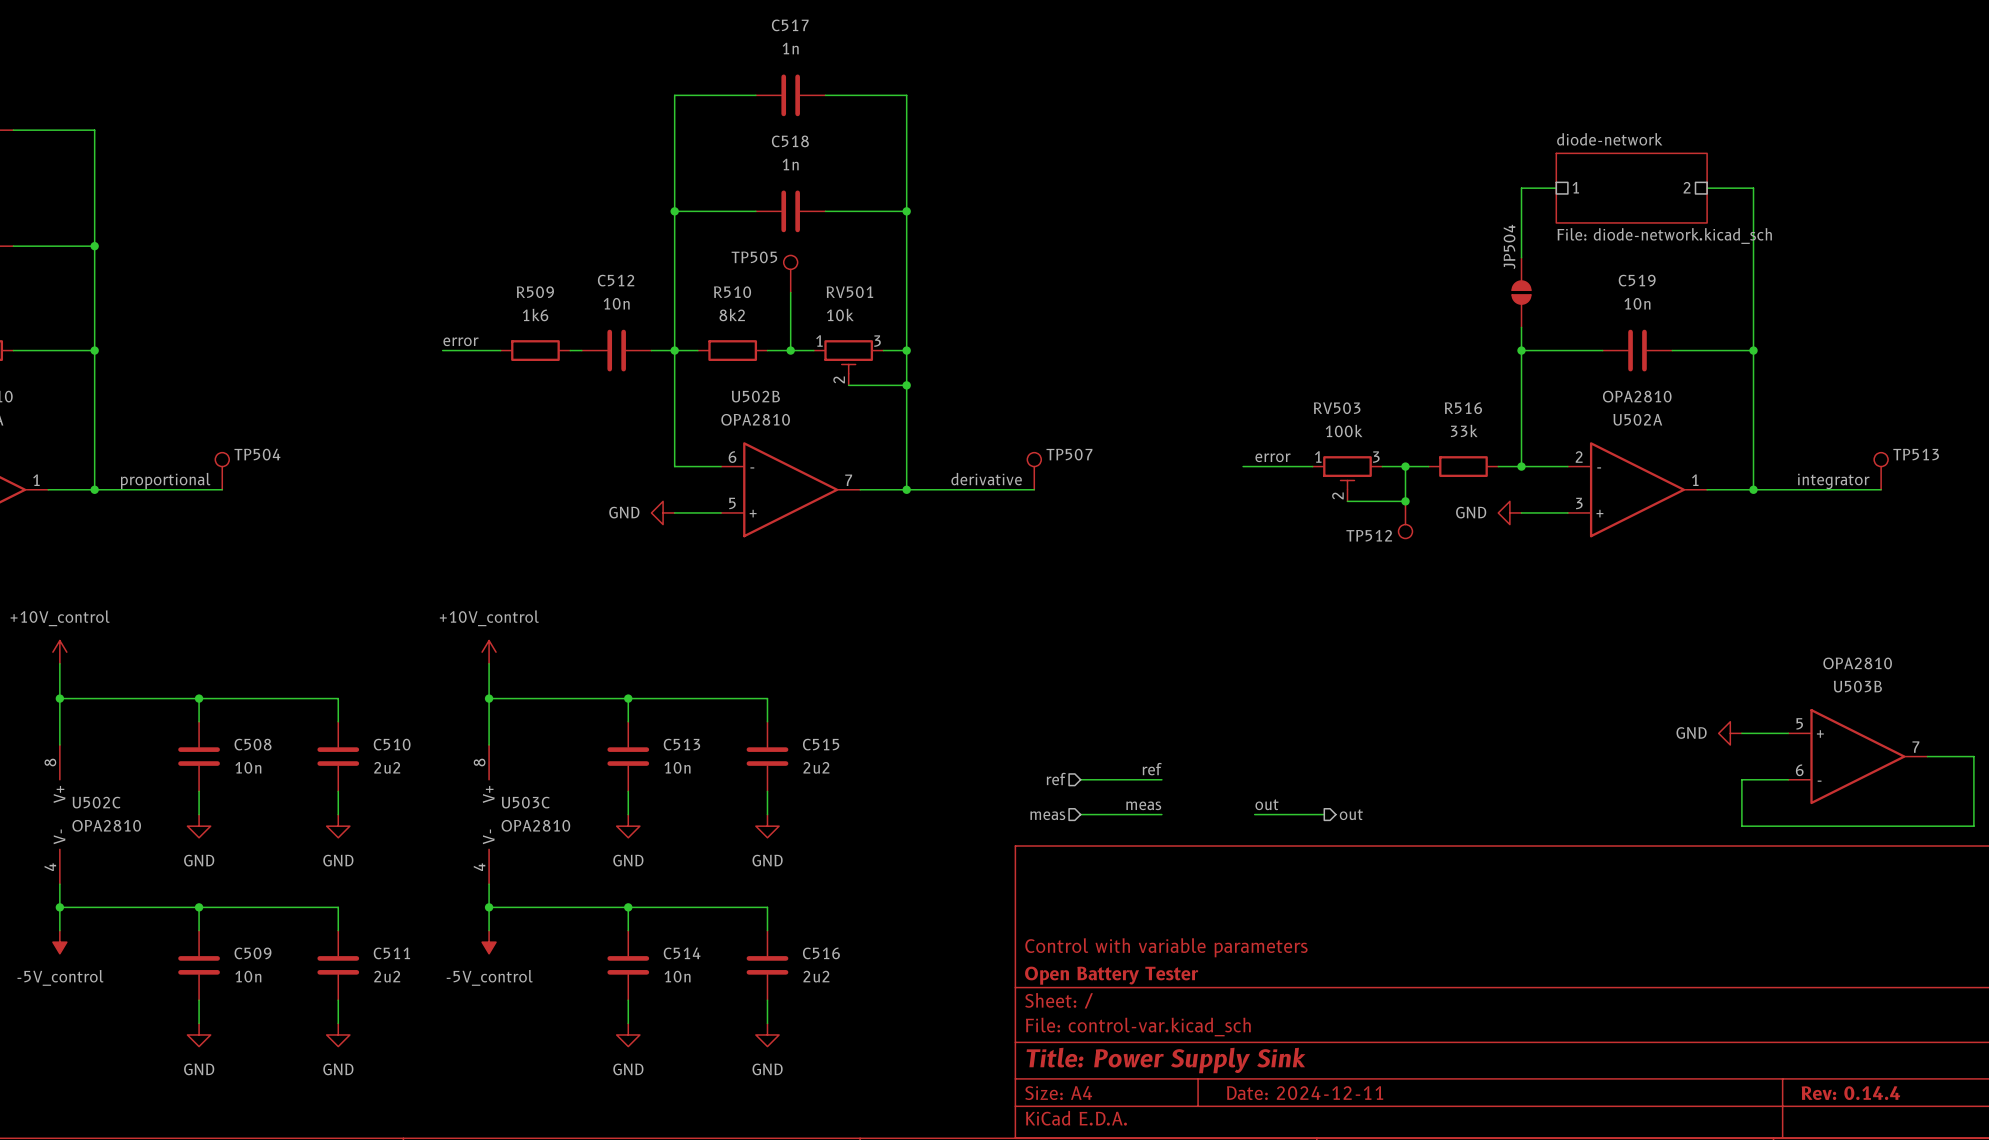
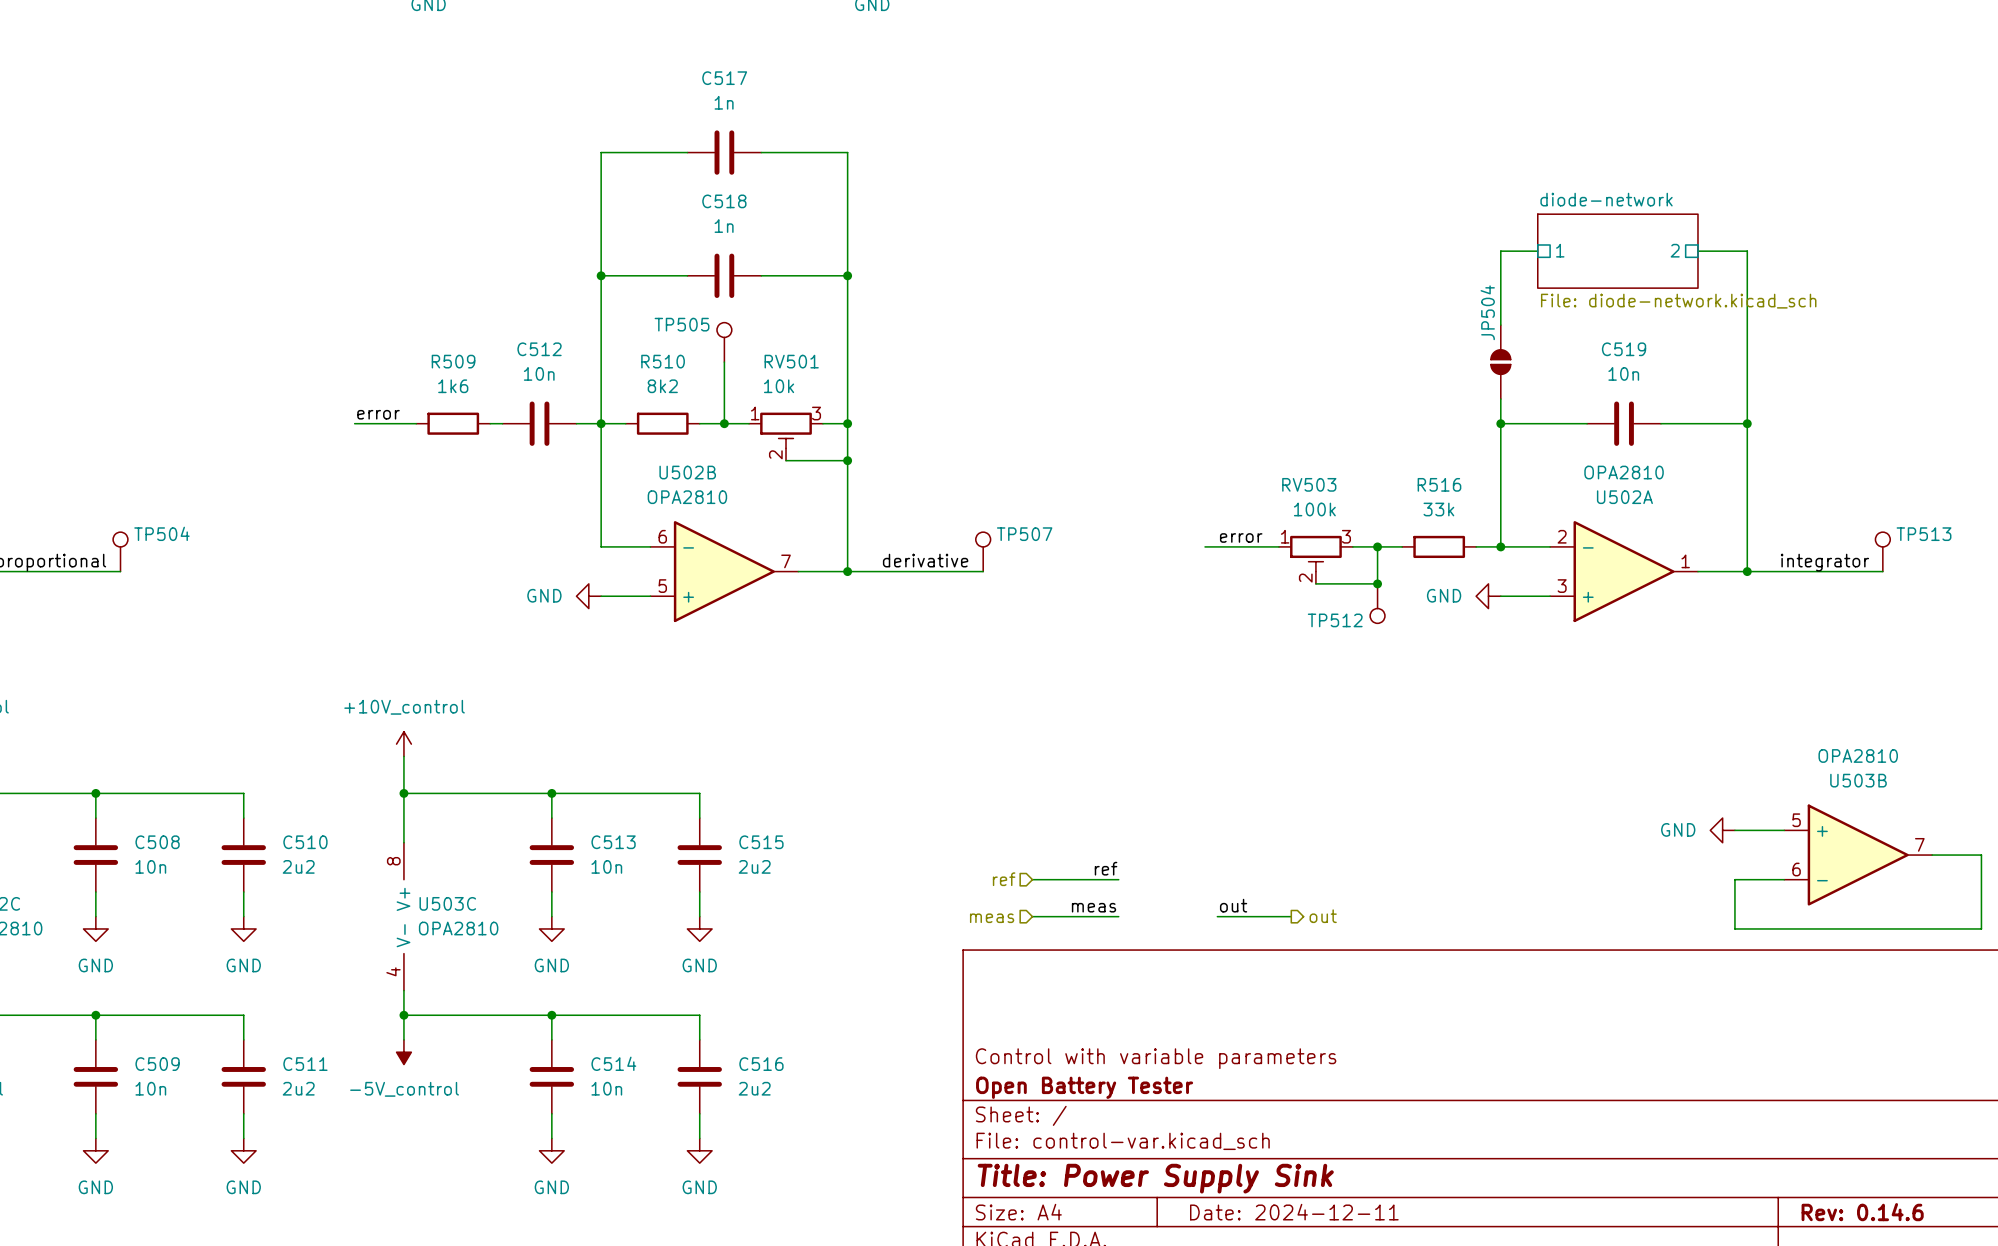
title block: Rev: 0.14.4 (1850, 1093) -> Rev: 0.14.6 (1862, 1212)

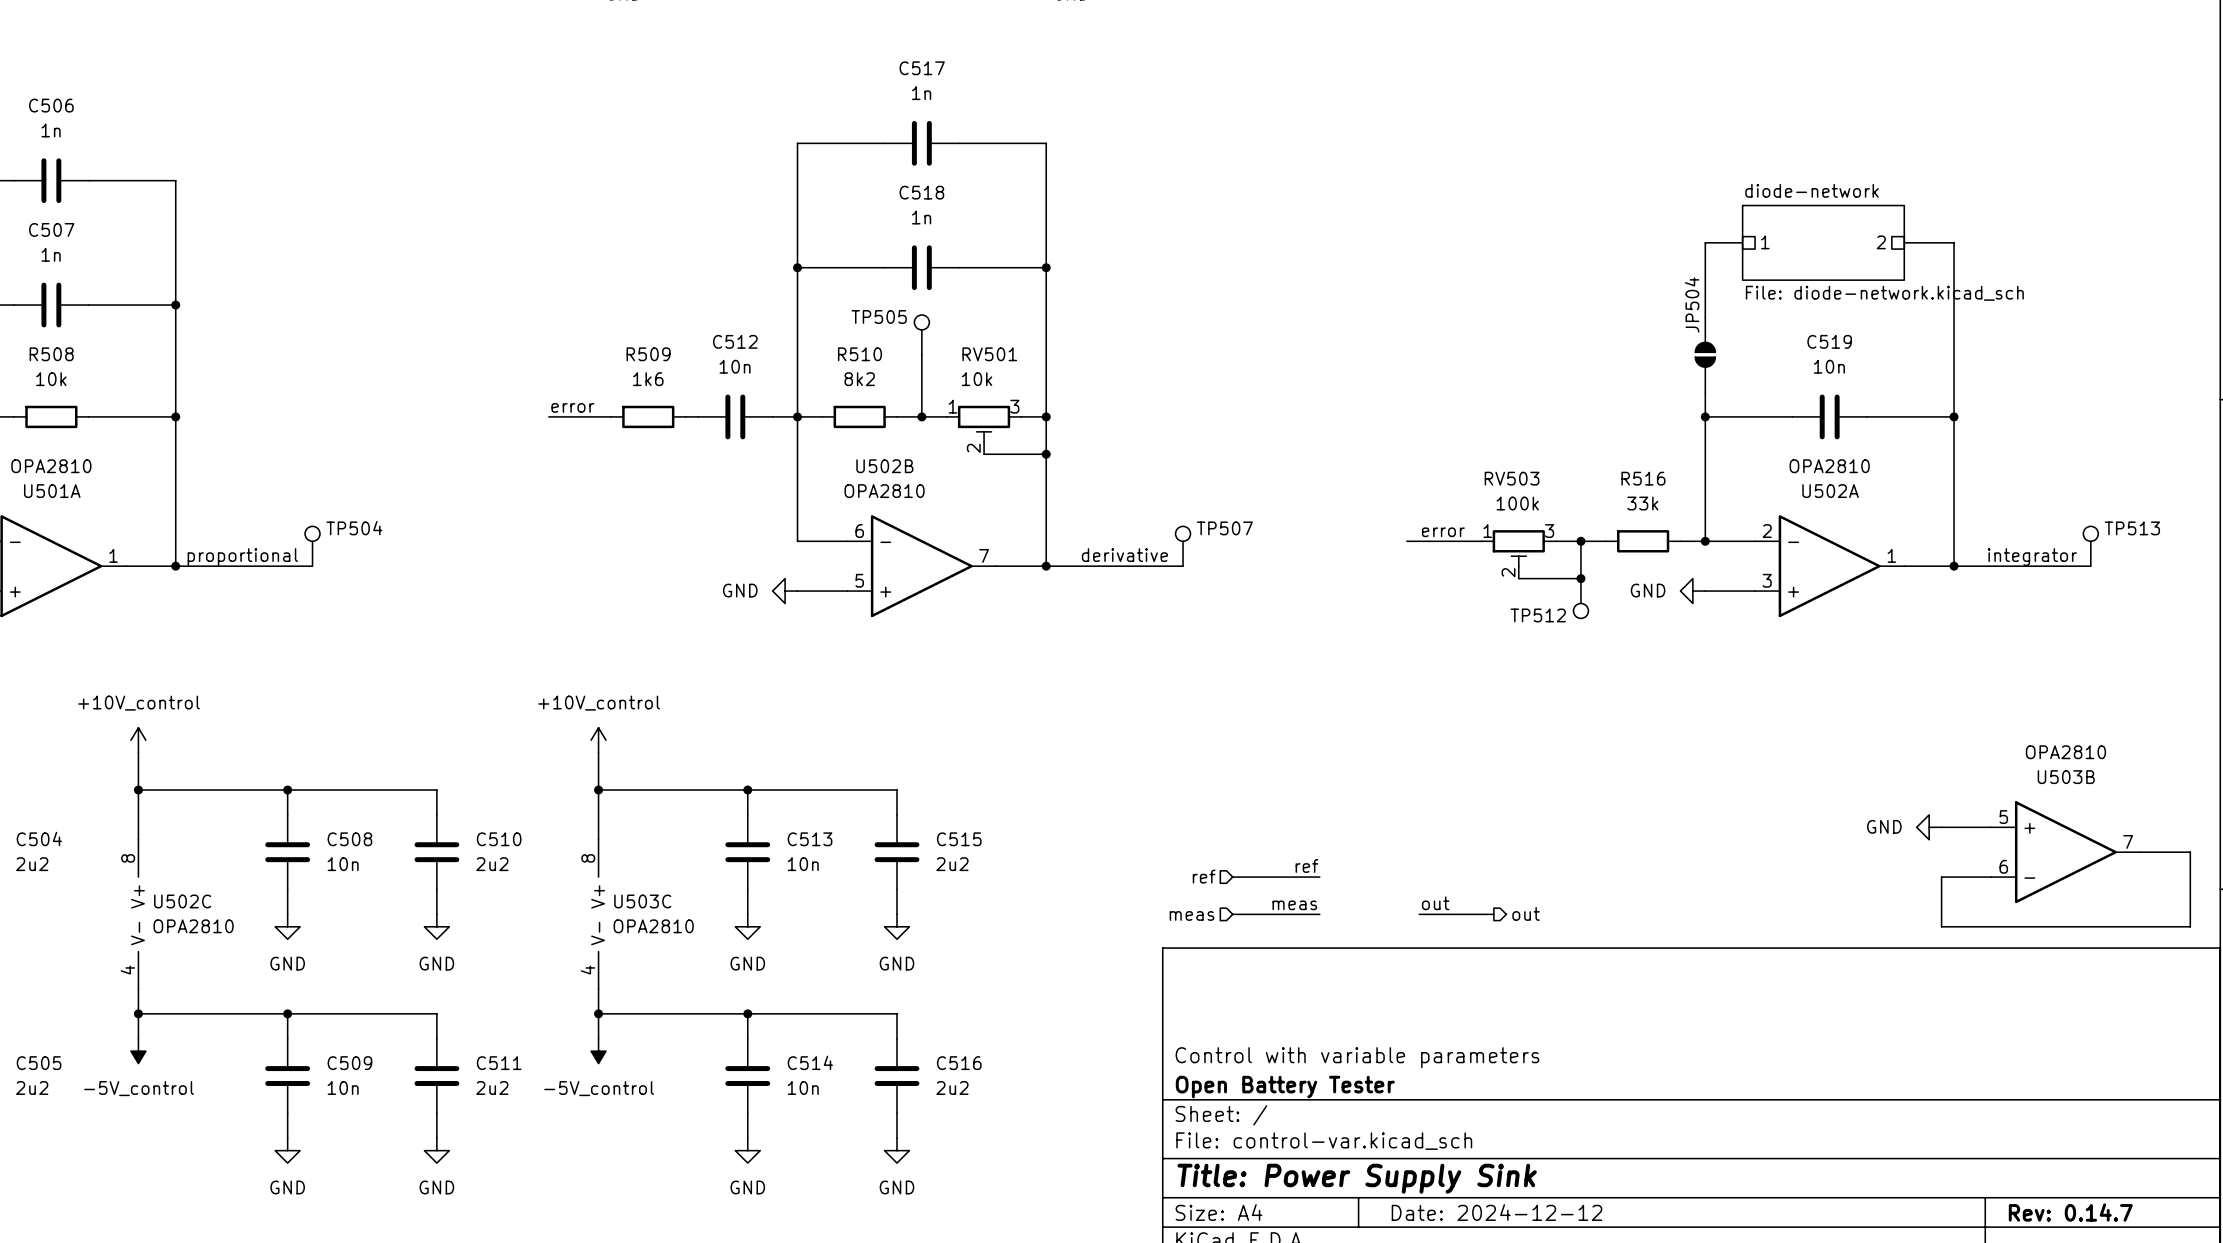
title block: Date: 2024-12-11 (1294, 1212) -> Date: 2024-12-12 (1497, 1212)
title block: Rev: 0.14.6 (1862, 1212) -> Rev: 0.14.7 (2070, 1212)

